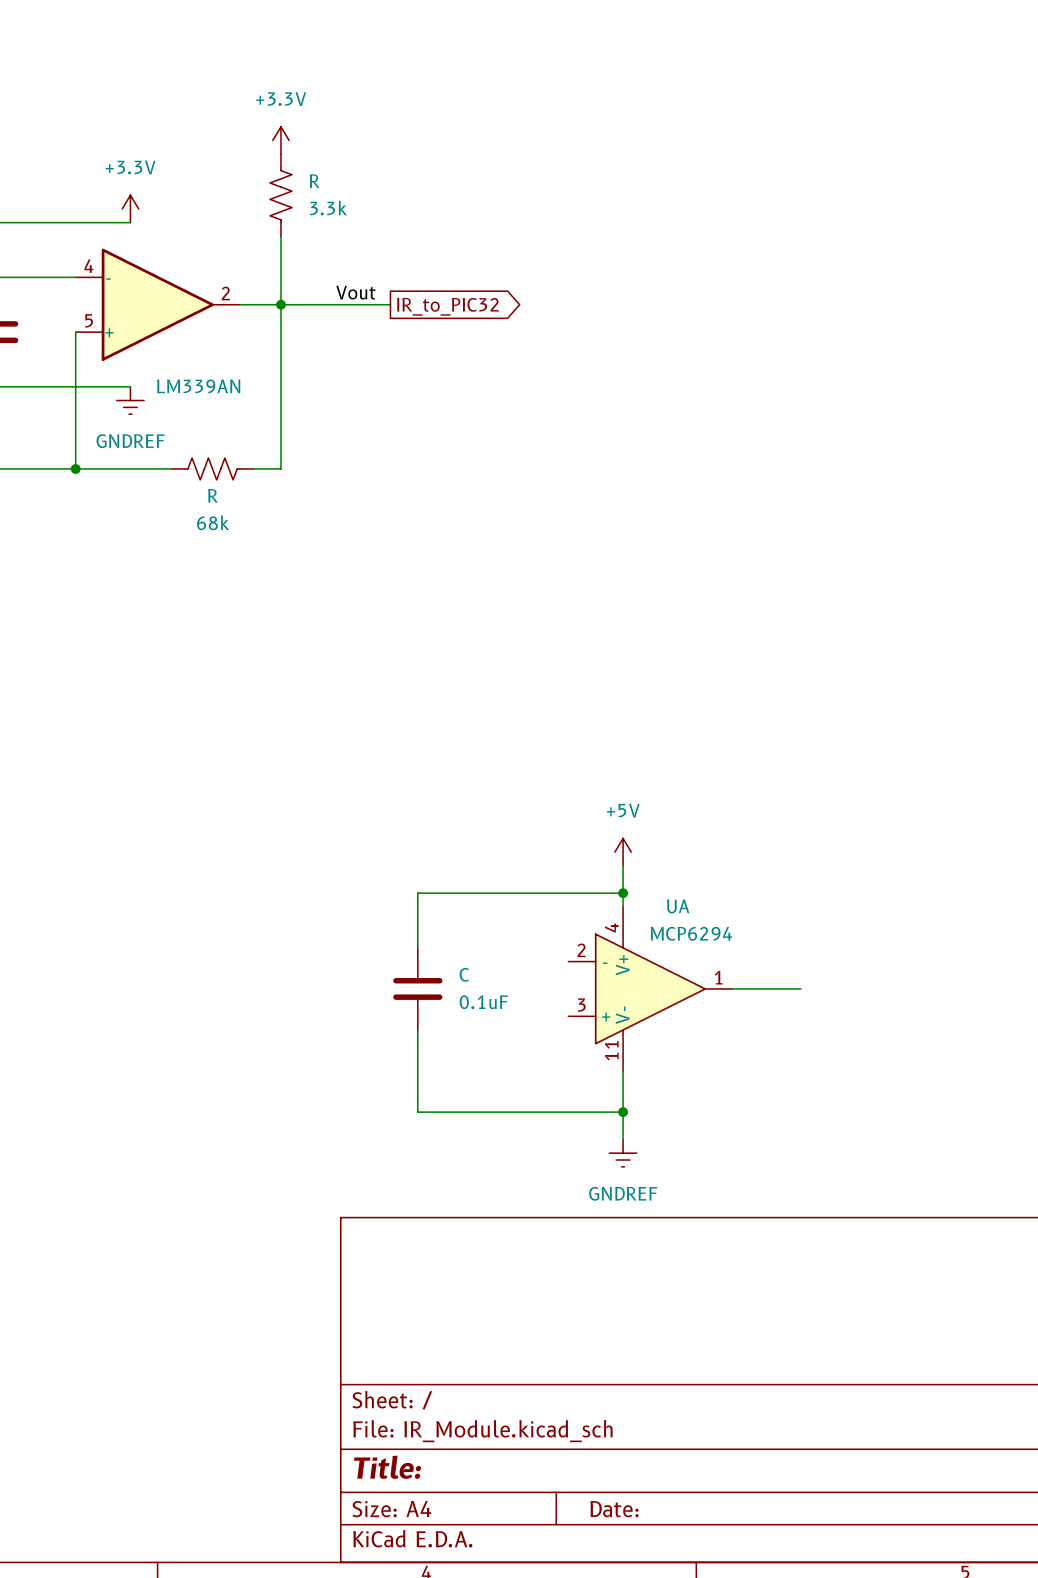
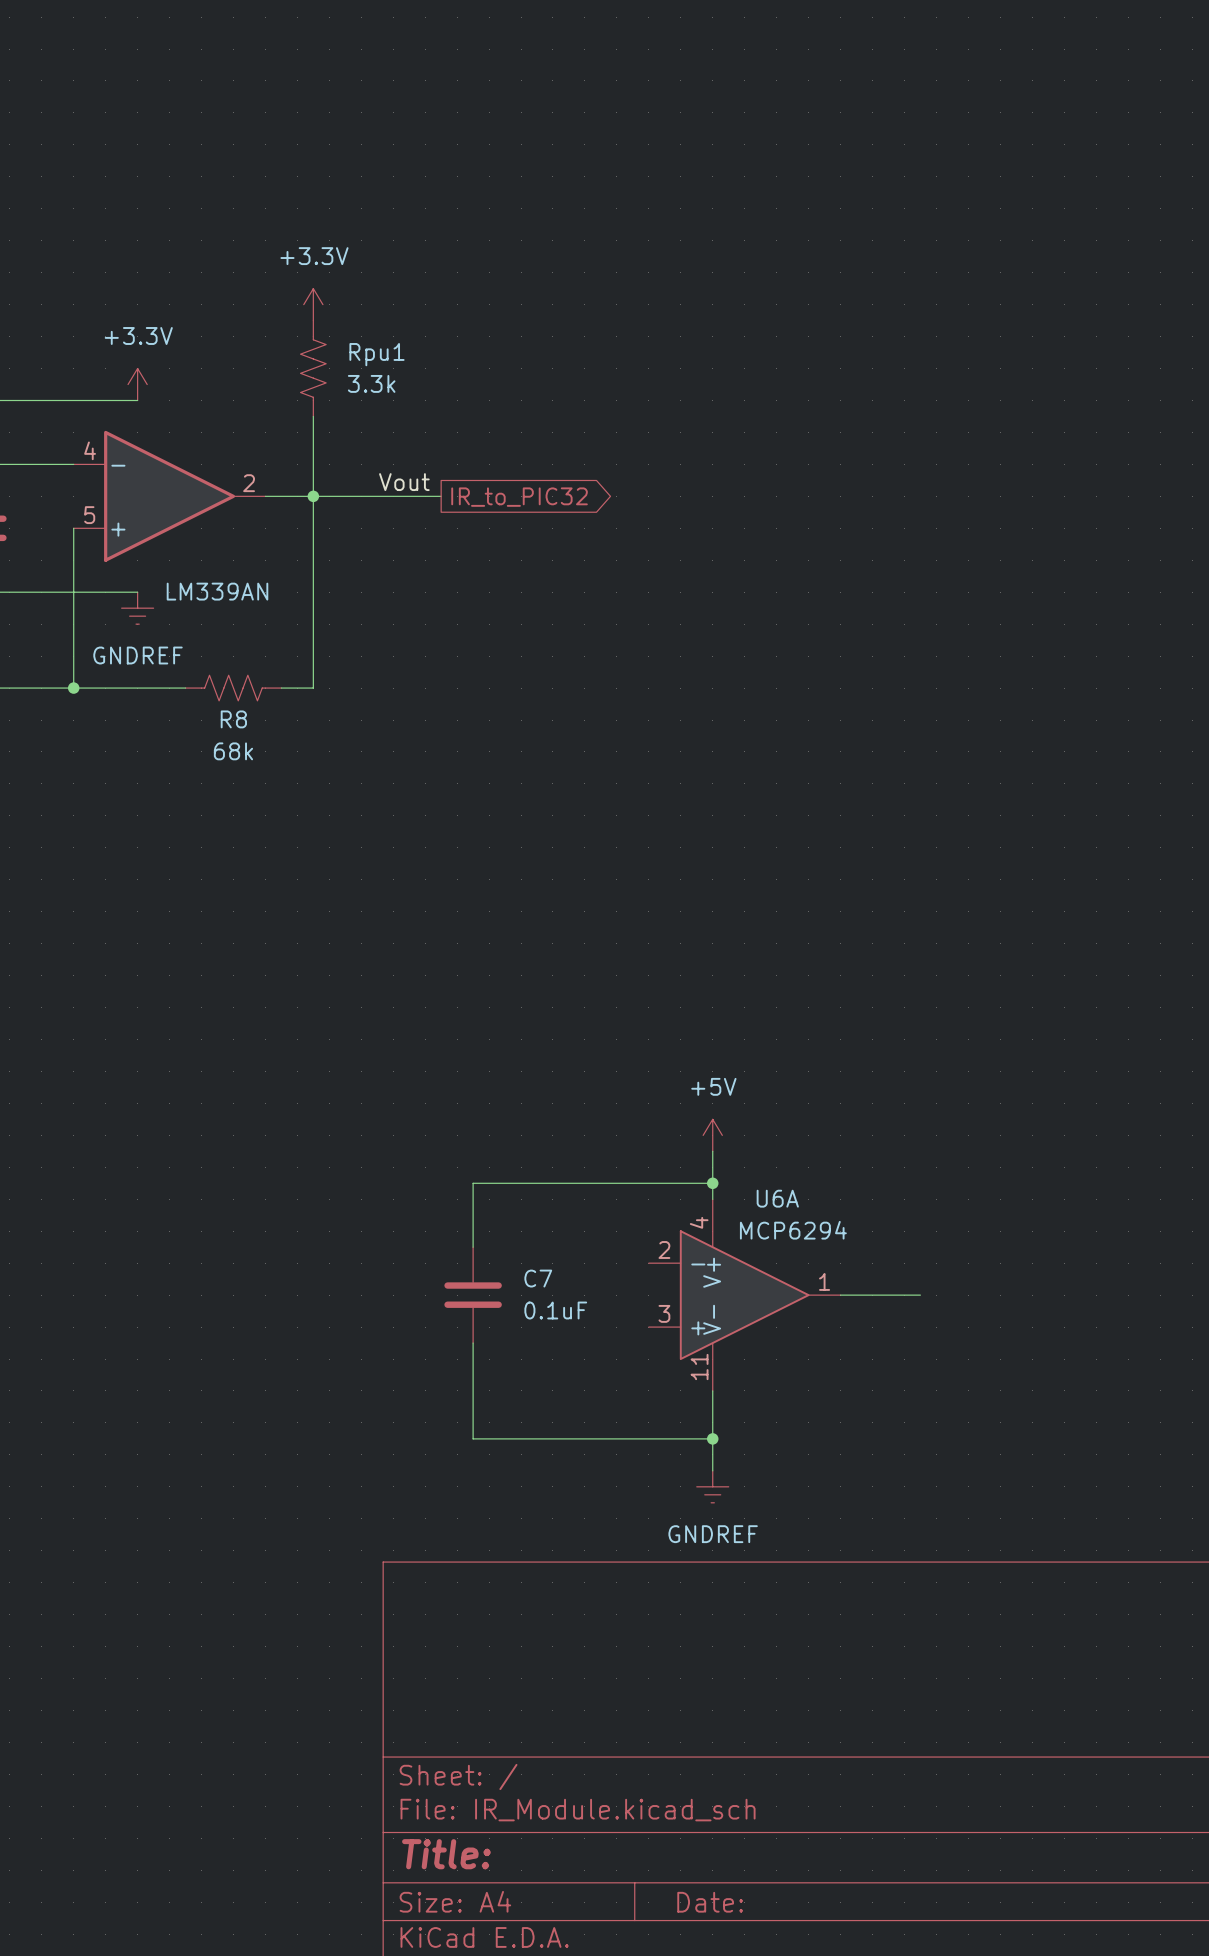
R name: R (314, 181) -> Rpu1 (376, 354)
R name: R (212, 495) -> R8 (233, 719)
UA name: UA (678, 906) -> U6A (777, 1198)
C name: C (464, 974) -> C7 (538, 1278)

